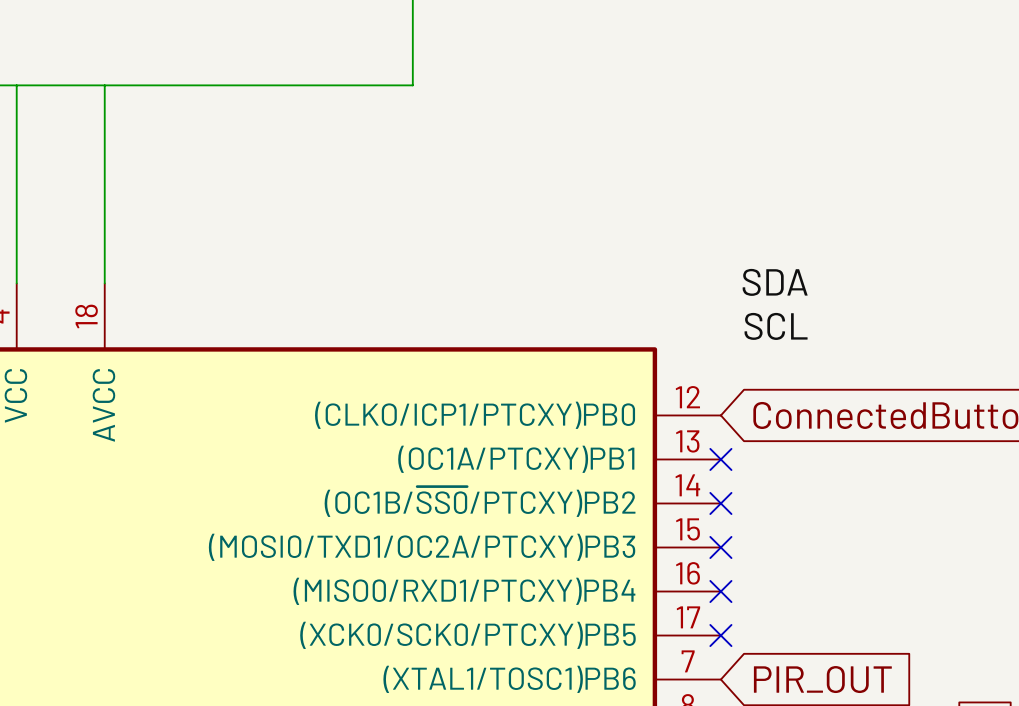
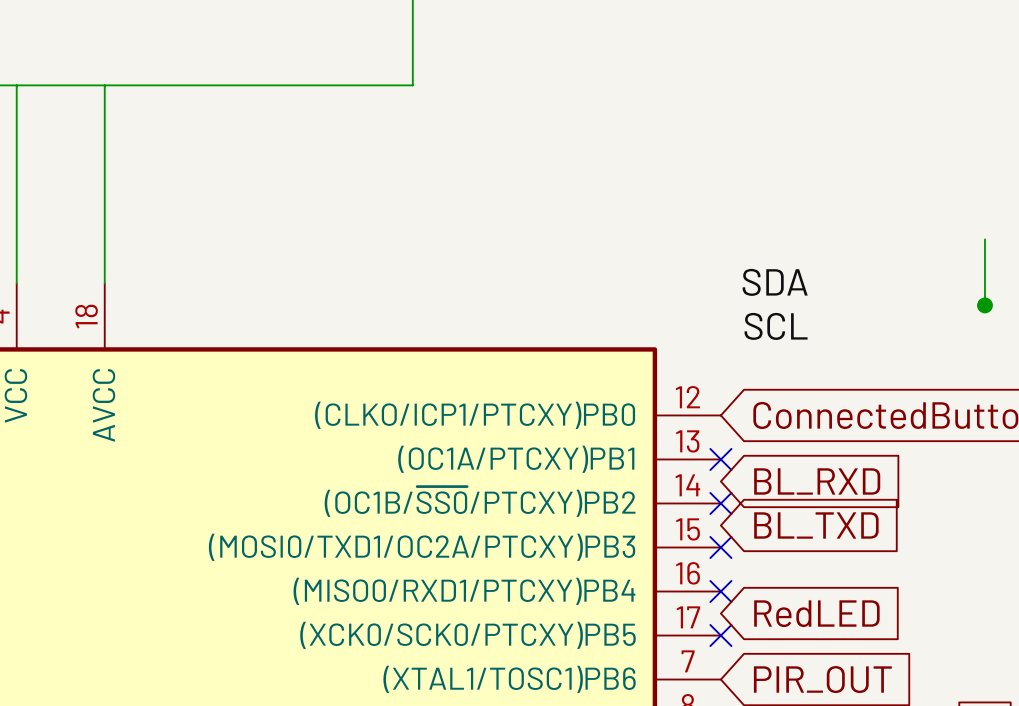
wire: none -> (984, 239) (984, 305)
junction: none -> (984, 305)
global label: none -> BL_RXD (817, 481)
global label: none -> BL_TXD (816, 525)
global label: none -> RedLED (816, 613)

